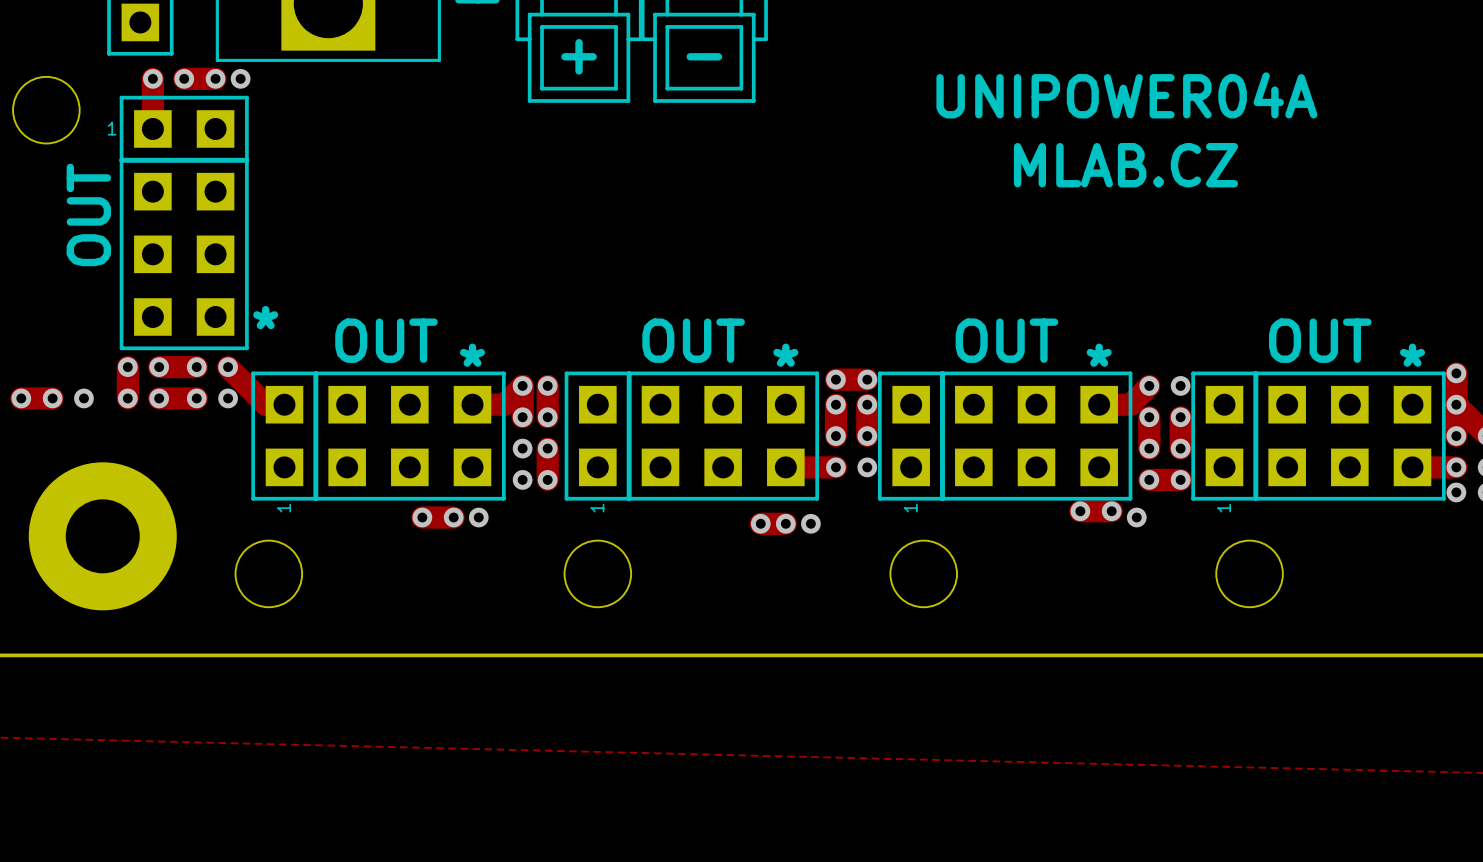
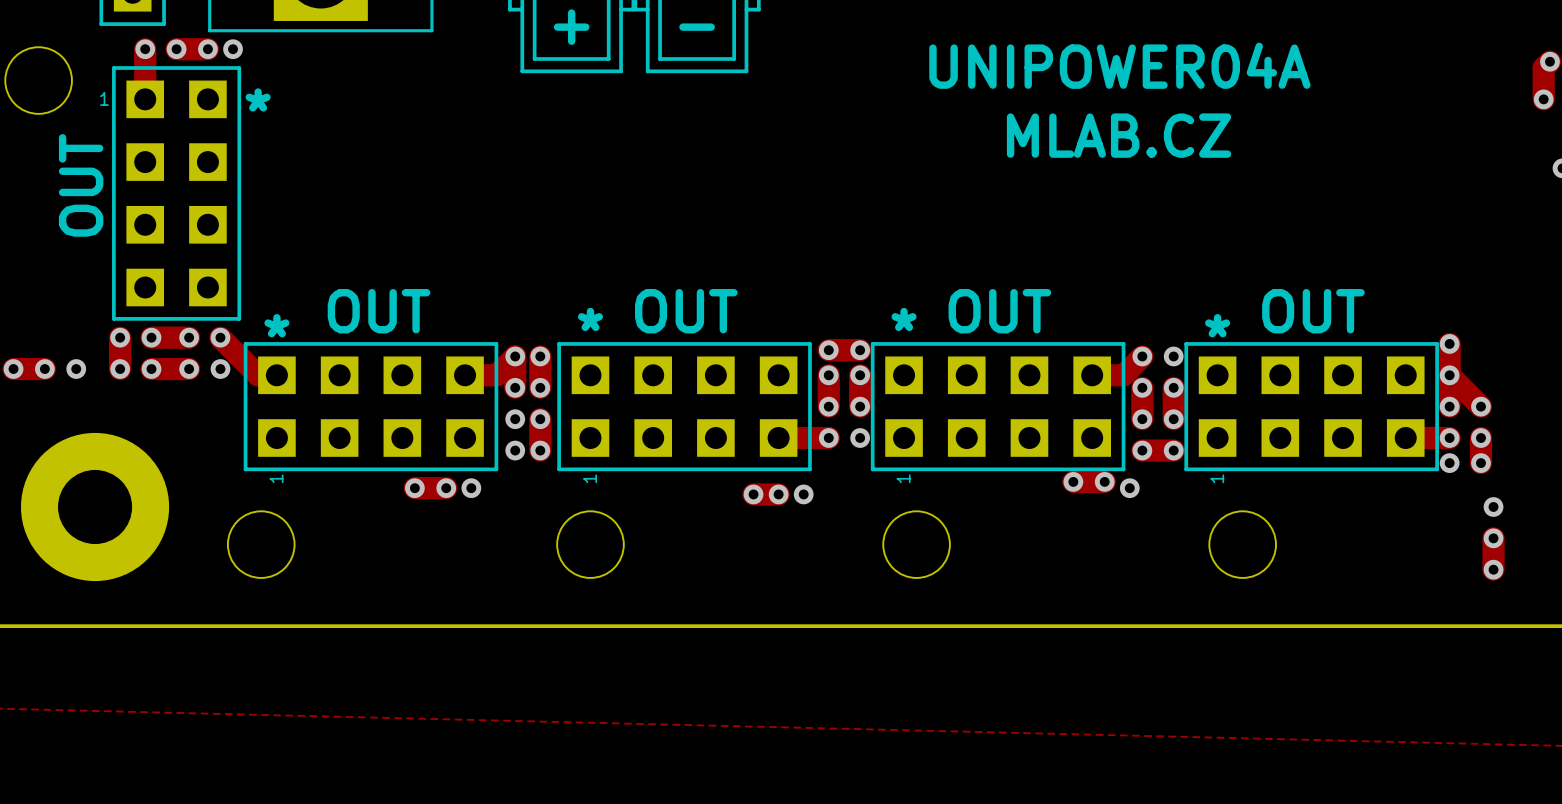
text: none -> * (258, 99)
line: (121, 160) (246, 160) -> none
text position: * (265, 317) -> * (276, 325)
text: none -> * (590, 319)
text: none -> * (904, 319)
text: * (472, 355) -> none
text: * (785, 355) -> none
text: * (1099, 355) -> none
text: none -> * (1217, 325)
text: * (1412, 355) -> none
line: (315, 373) (315, 498) -> none
line: (629, 373) (629, 498) -> none
line: (942, 373) (942, 498) -> none
line: (1255, 373) (1255, 498) -> none

